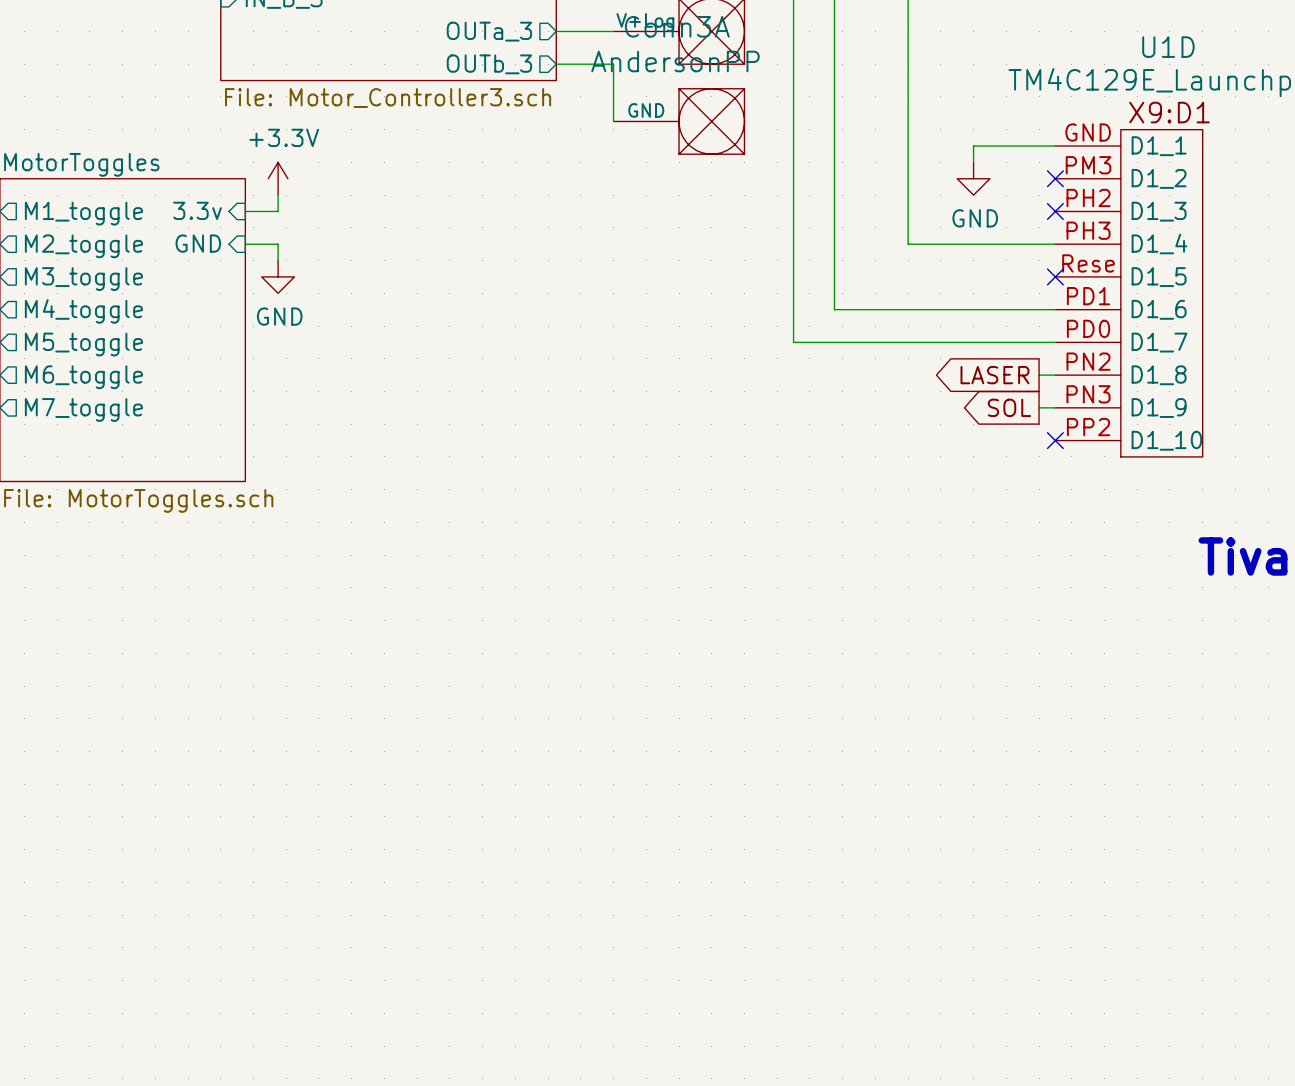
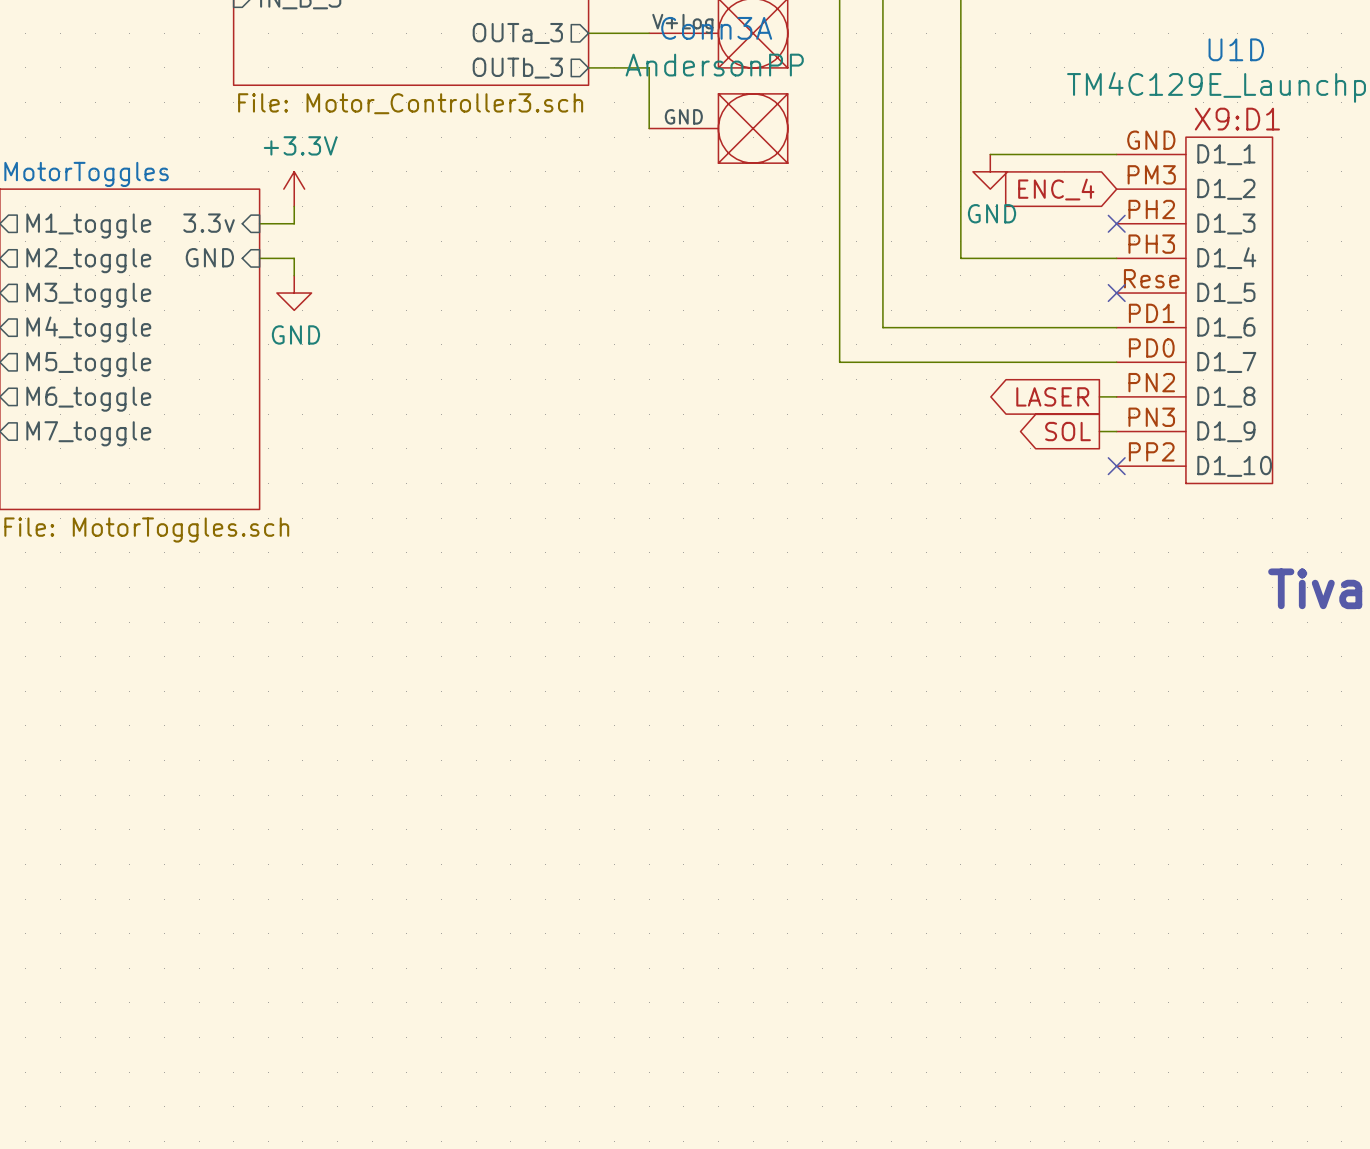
wire: (973, 146) (973, 162) -> (1030, 154) (990, 154)
power symbol position: GND (973, 178) -> GND (990, 171)
no-connect mark: (1055, 178) -> none
global label: none -> ENC_4 (1056, 189)

